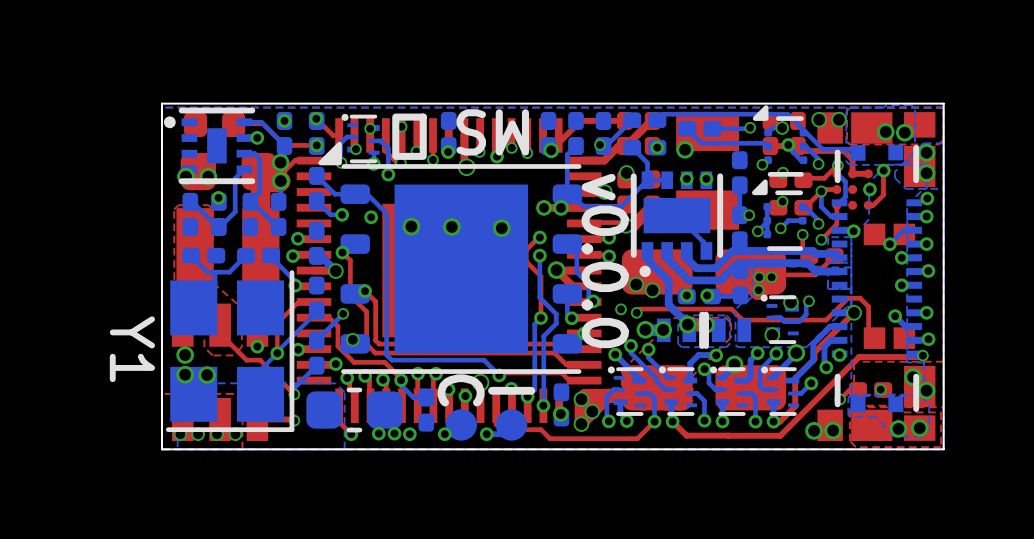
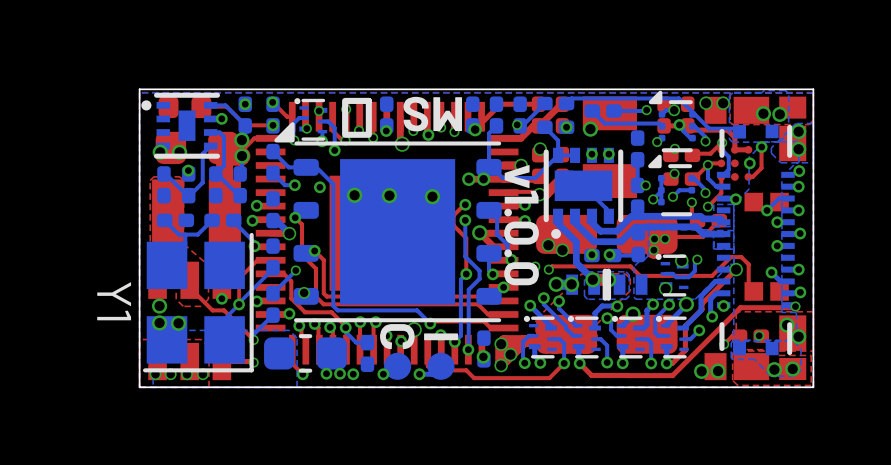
text: v0.0.0 (605, 261) -> v1.0.0 (521, 225)

